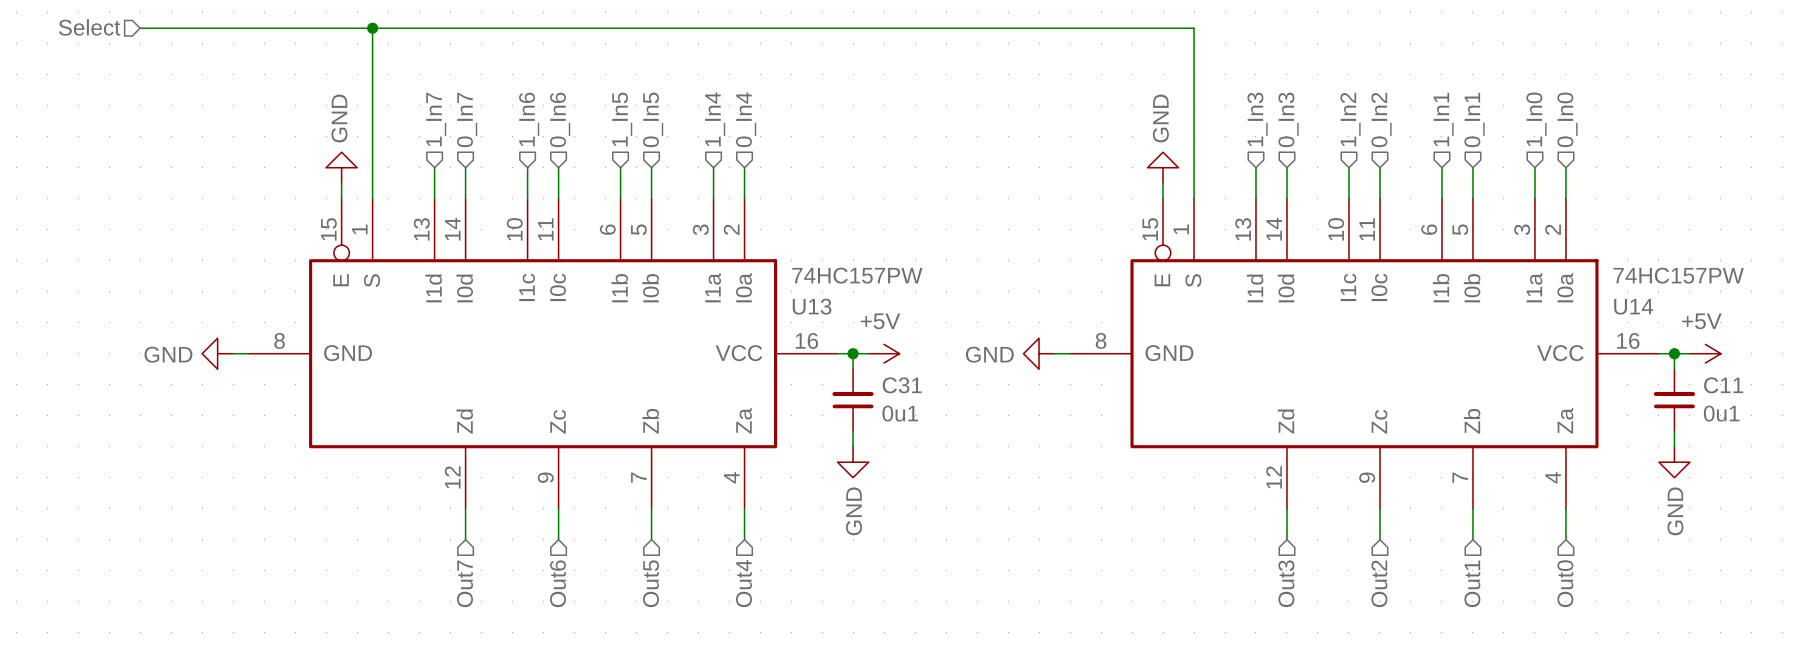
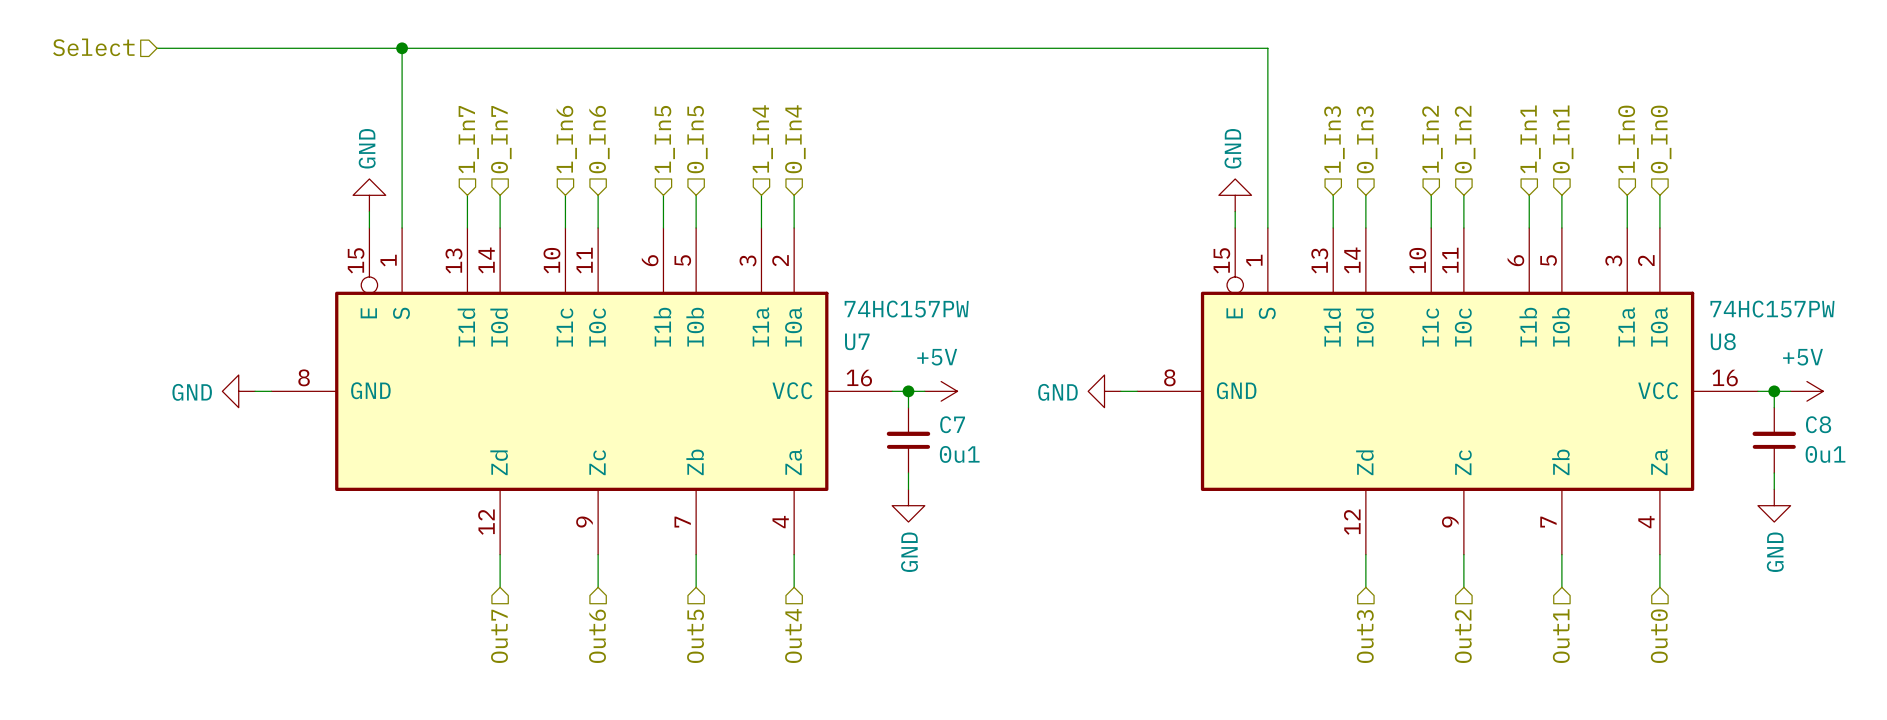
U13 name: U13 (812, 306) -> U7 (857, 341)
U14 name: U14 (1633, 306) -> U8 (1723, 341)
C31 name: C31 (902, 385) -> C7 (952, 424)
C11 name: C11 (1723, 385) -> C8 (1818, 424)

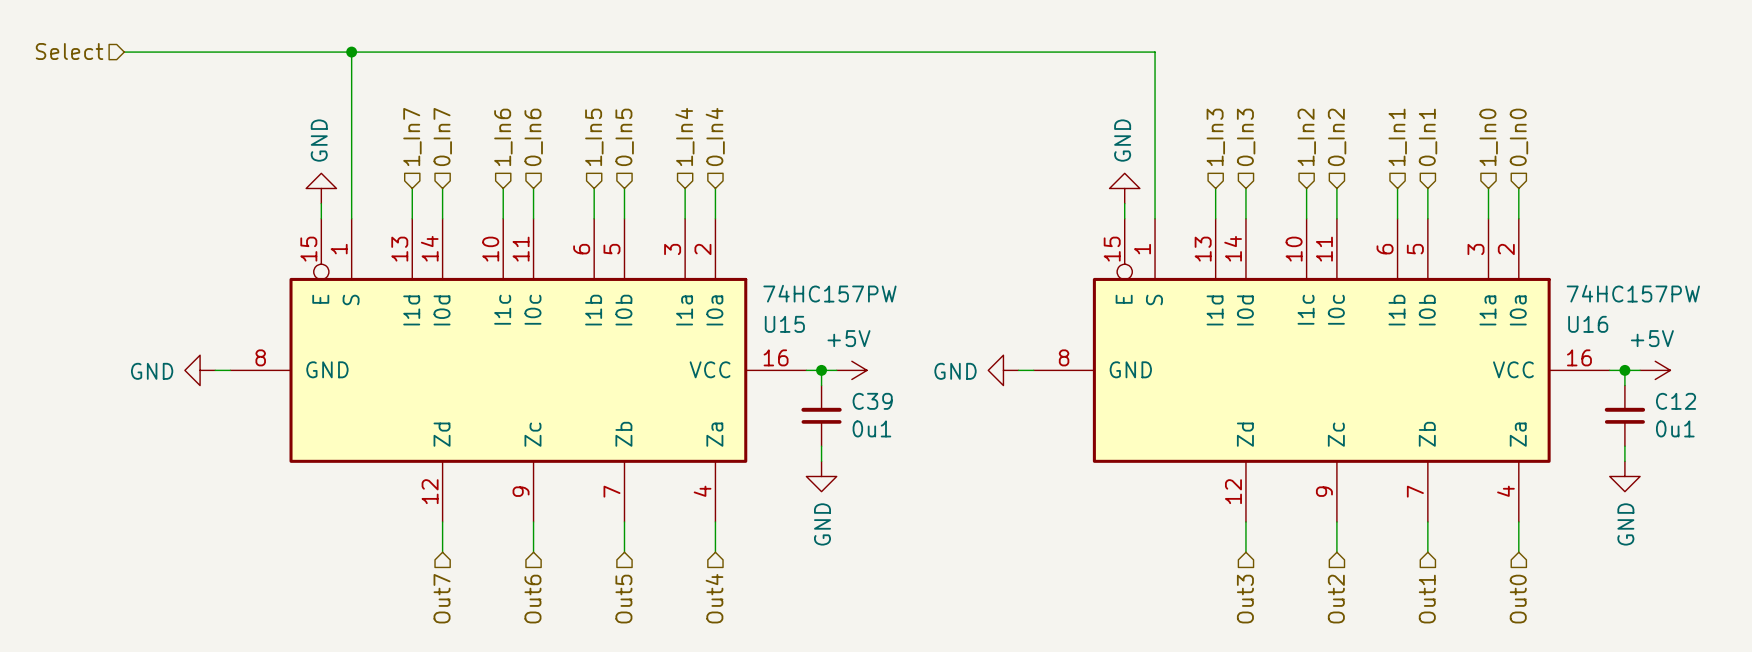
U7 name: U7 (857, 341) -> U15 (784, 324)
U8 name: U8 (1723, 341) -> U16 (1588, 324)
C7 name: C7 (952, 424) -> C39 (872, 401)
C8 name: C8 (1818, 424) -> C12 (1676, 401)

